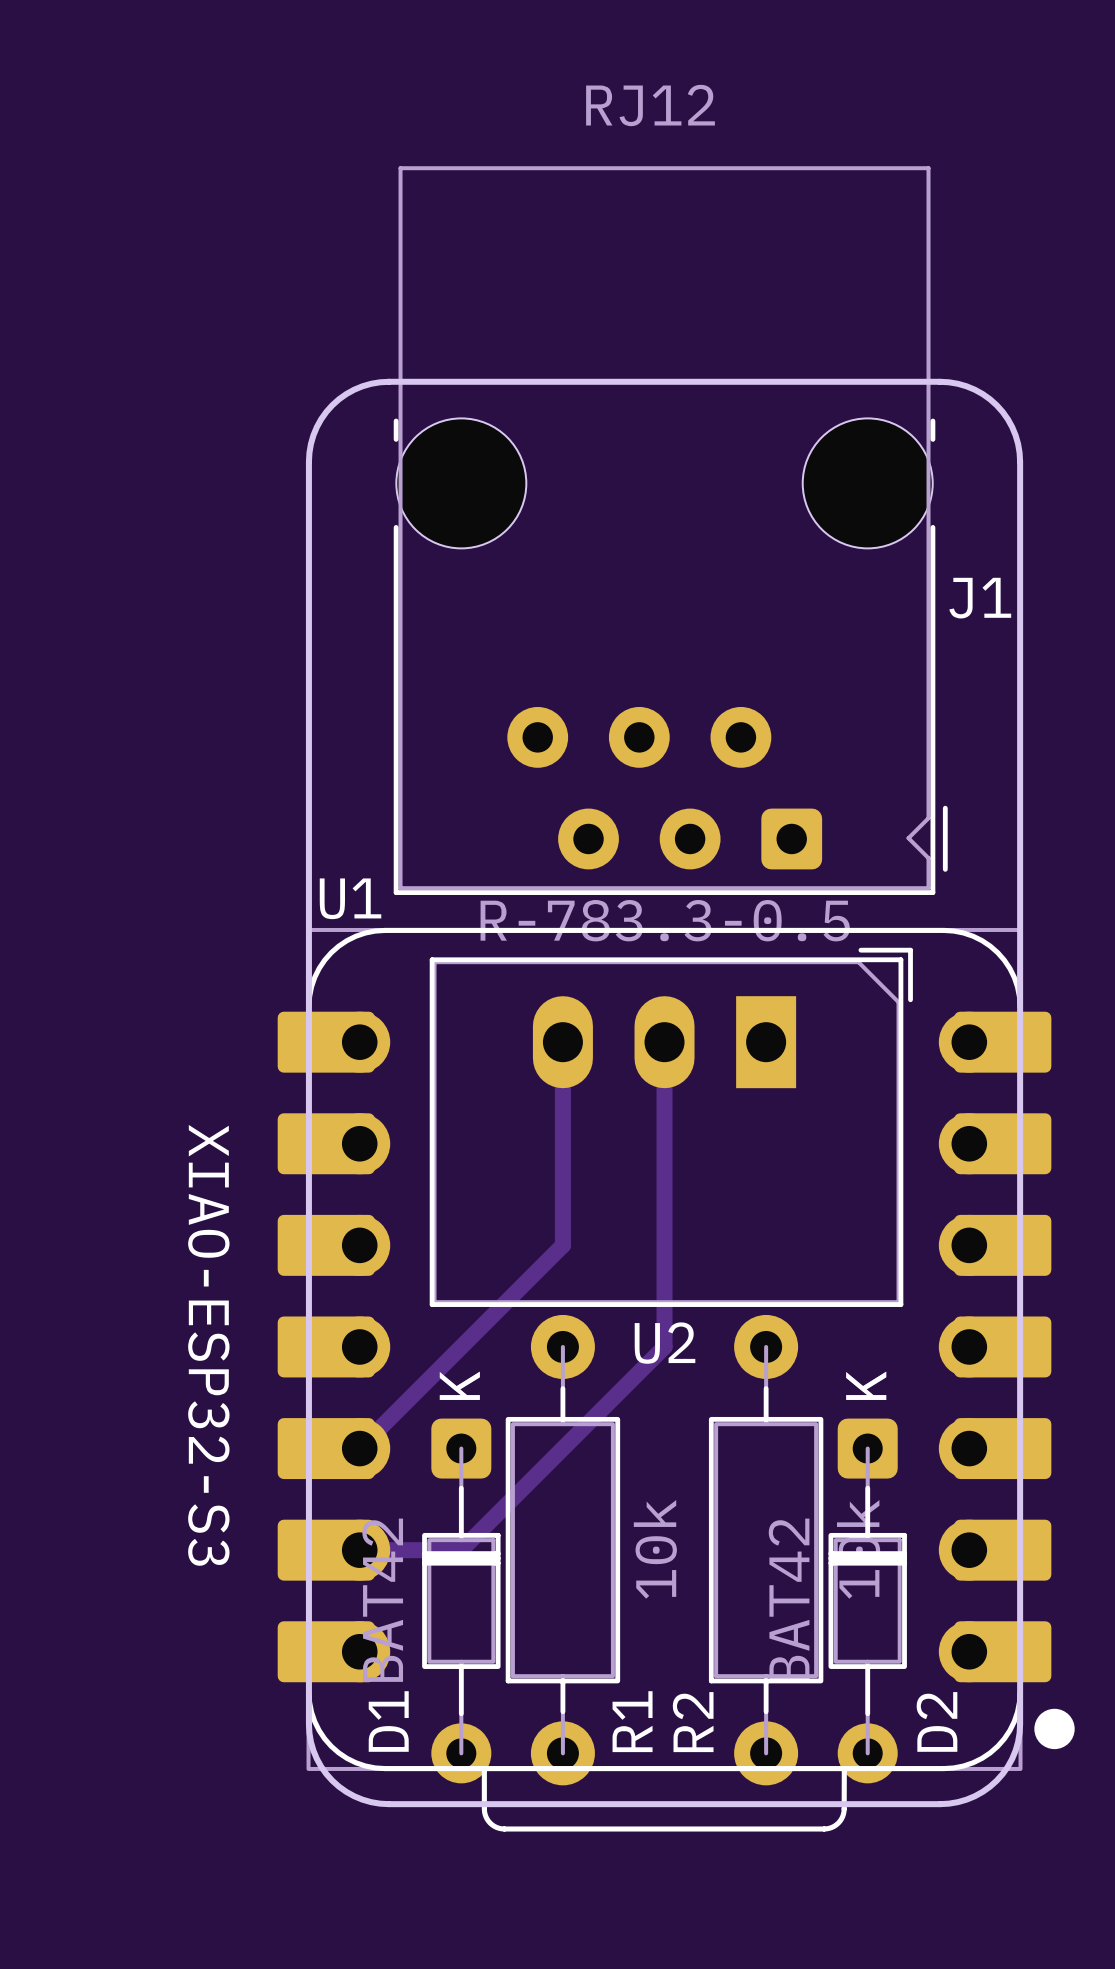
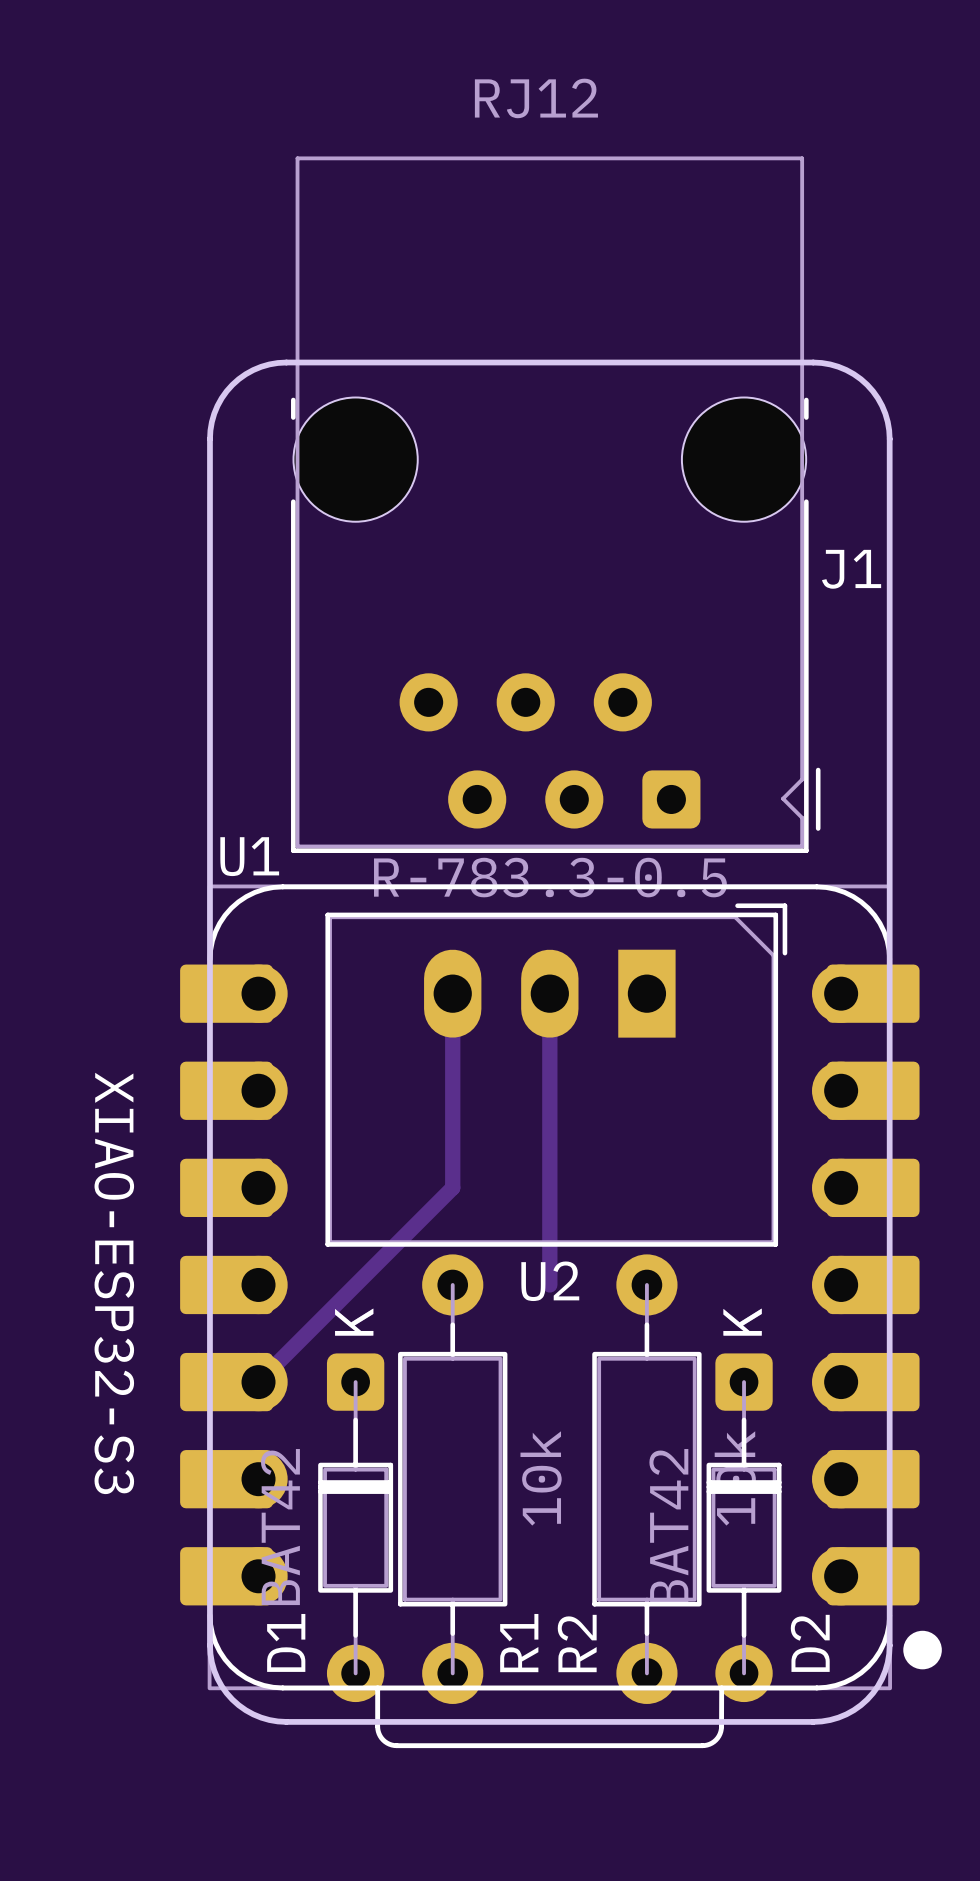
track: (664, 1346) (461, 1550) (359, 1550) -> none

